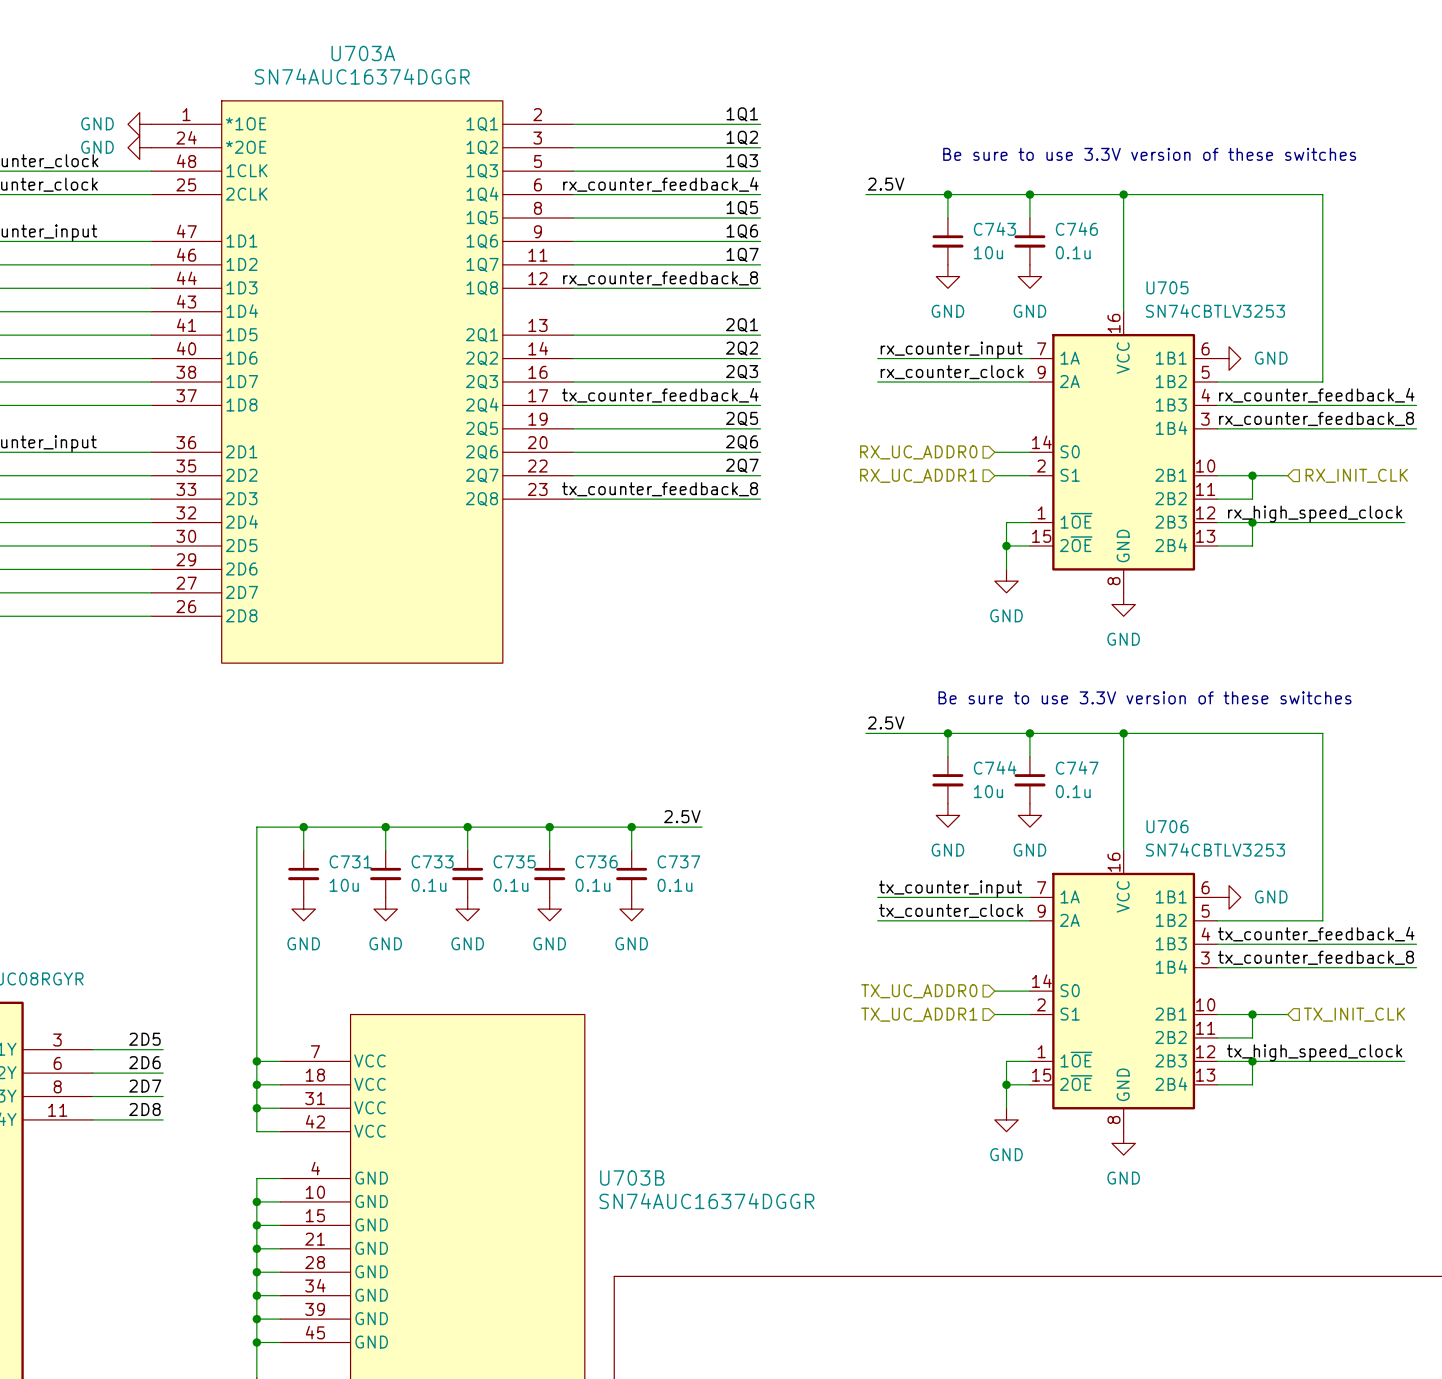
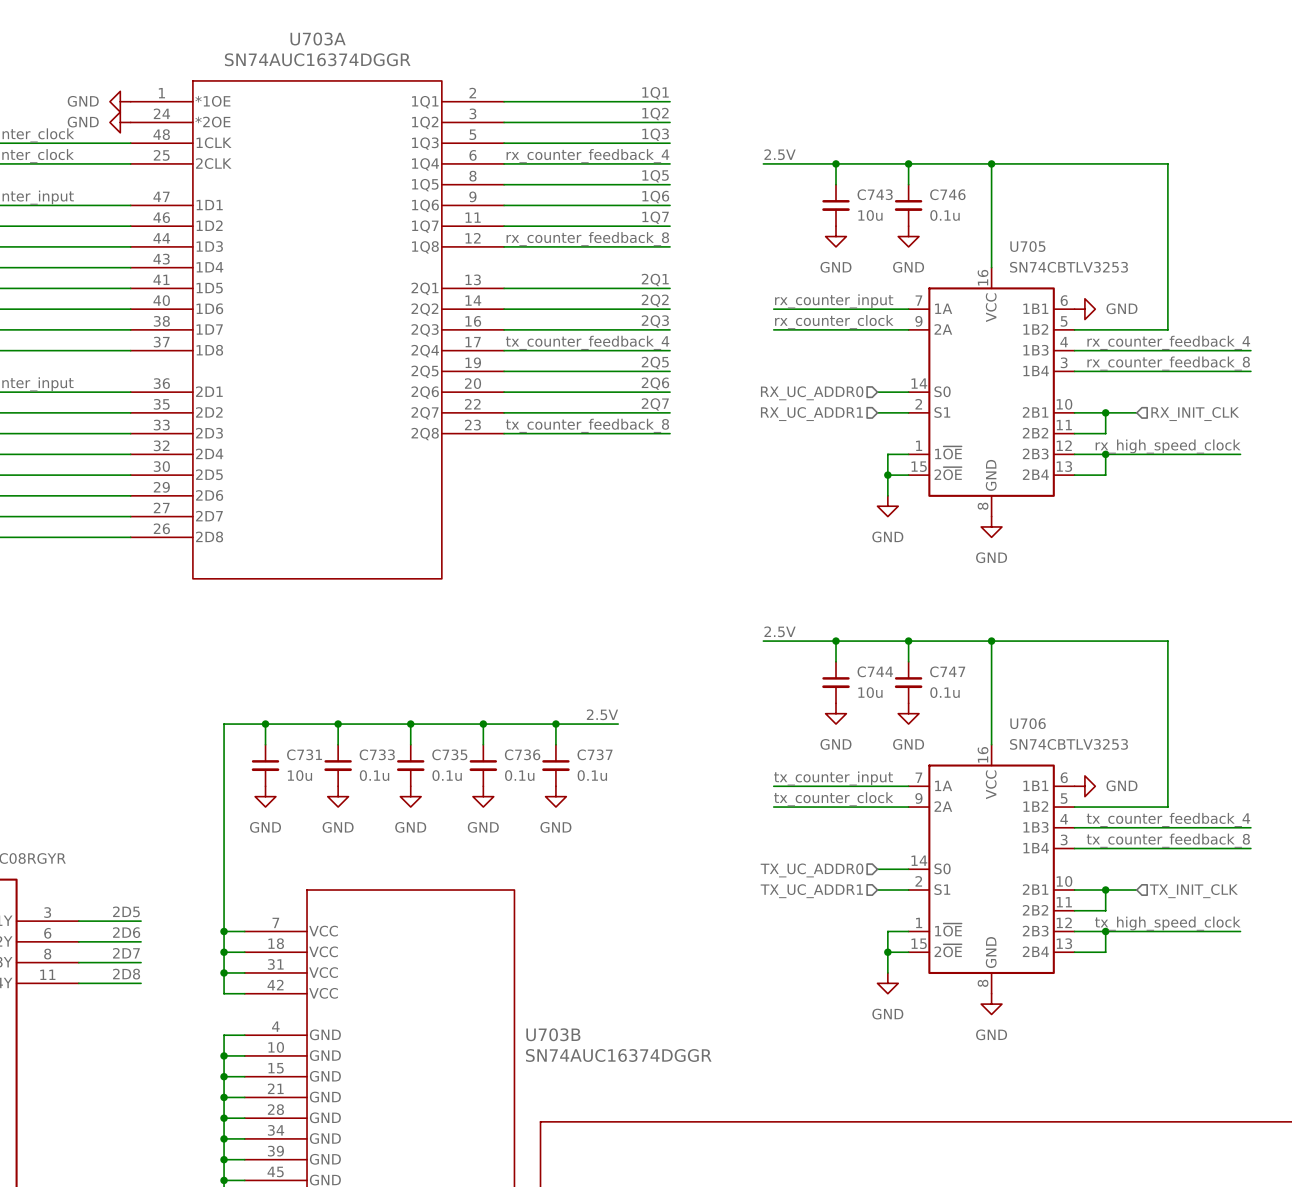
text: Be sure to use 3.3V version of these switches (1149, 154) -> none
text: Be sure to use 3.3V version of these switches (1145, 697) -> none

